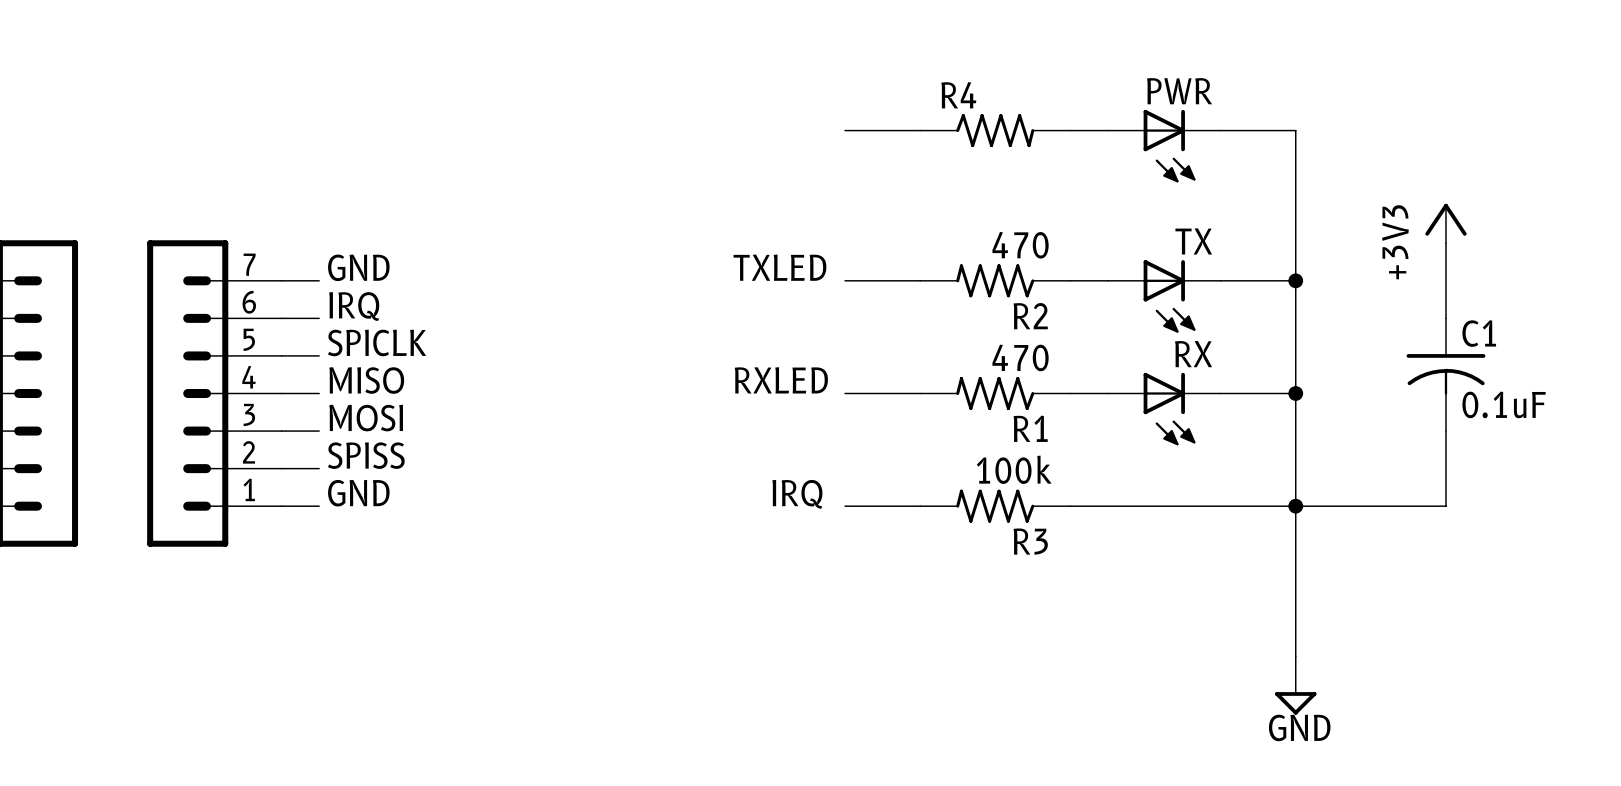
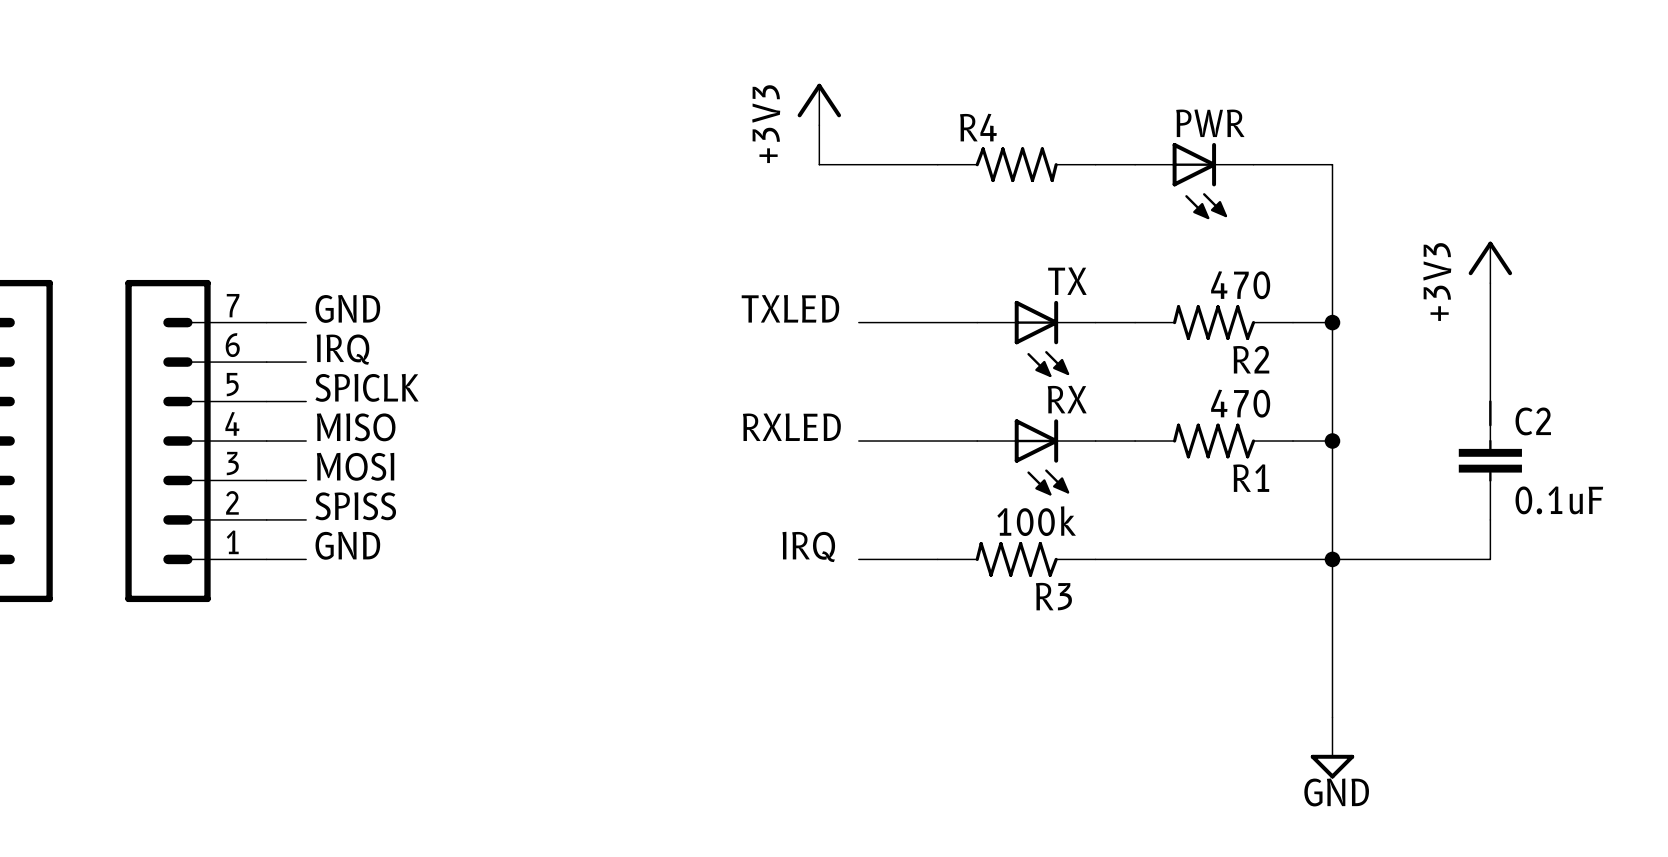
power symbol: none -> +3V3 (819, 104)
wire: none -> (819, 125) (819, 164) (858, 164)
R2 position: (995, 280) -> (1214, 322)
TX position: (1164, 296) -> (1036, 338)
C1: 0.1uF (1445, 374) -> none
R1 position: (995, 393) -> (1214, 441)
RX position: (1164, 409) -> (1036, 457)
C2: none -> 0.1uF (1490, 460)

